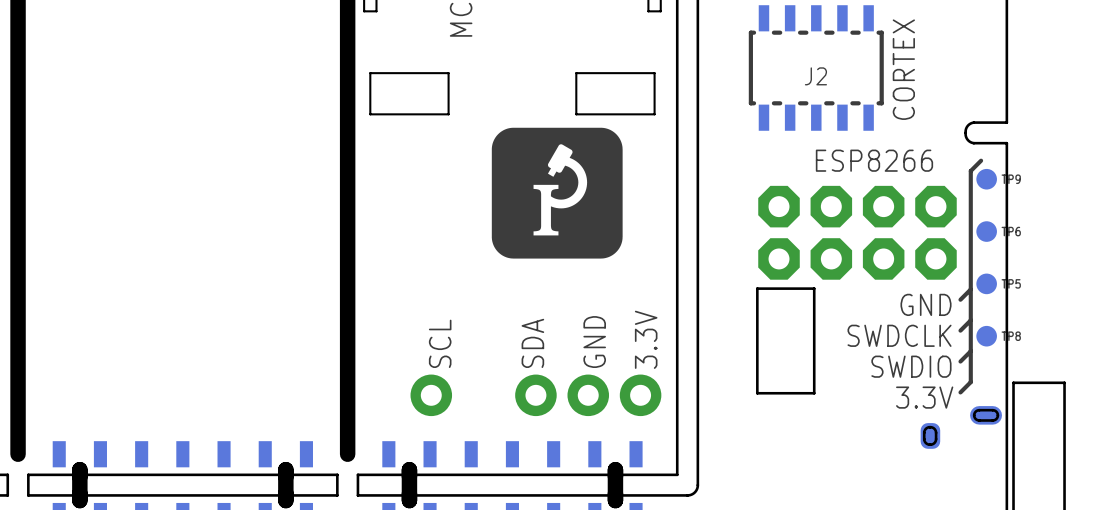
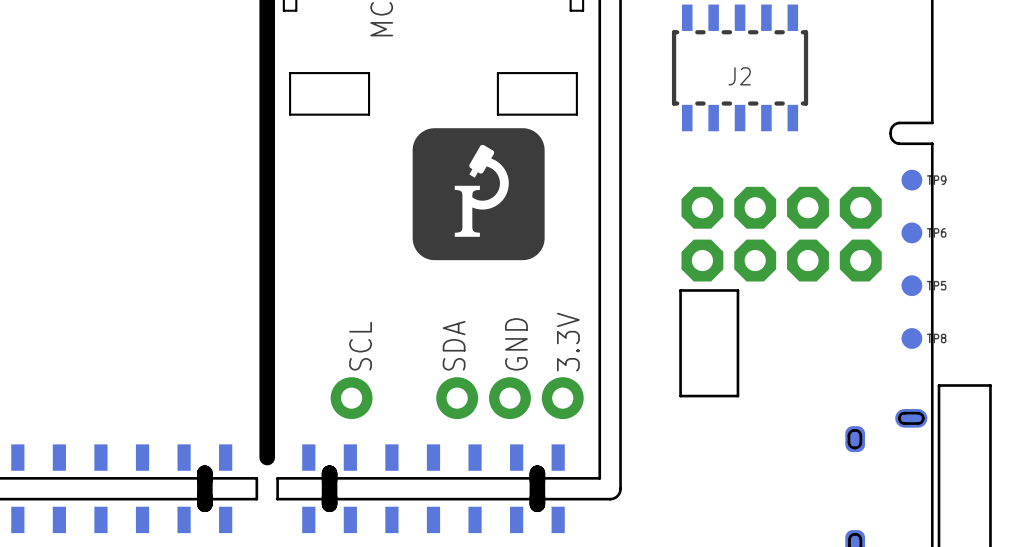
text: CORTEX (903, 69) -> none
text: ESP8266 (874, 160) -> none
line: (981, 160) (970, 170) (970, 382) (960, 392) -> none
line: (970, 289) (960, 299) -> none
text: GND (926, 304) -> none
line: (970, 320) (960, 330) -> none
text: SWDCLK (899, 335) -> none
line: (970, 351) (960, 361) -> none
text: SWDIO (911, 366) -> none
text: 3.3V (924, 397) -> none

